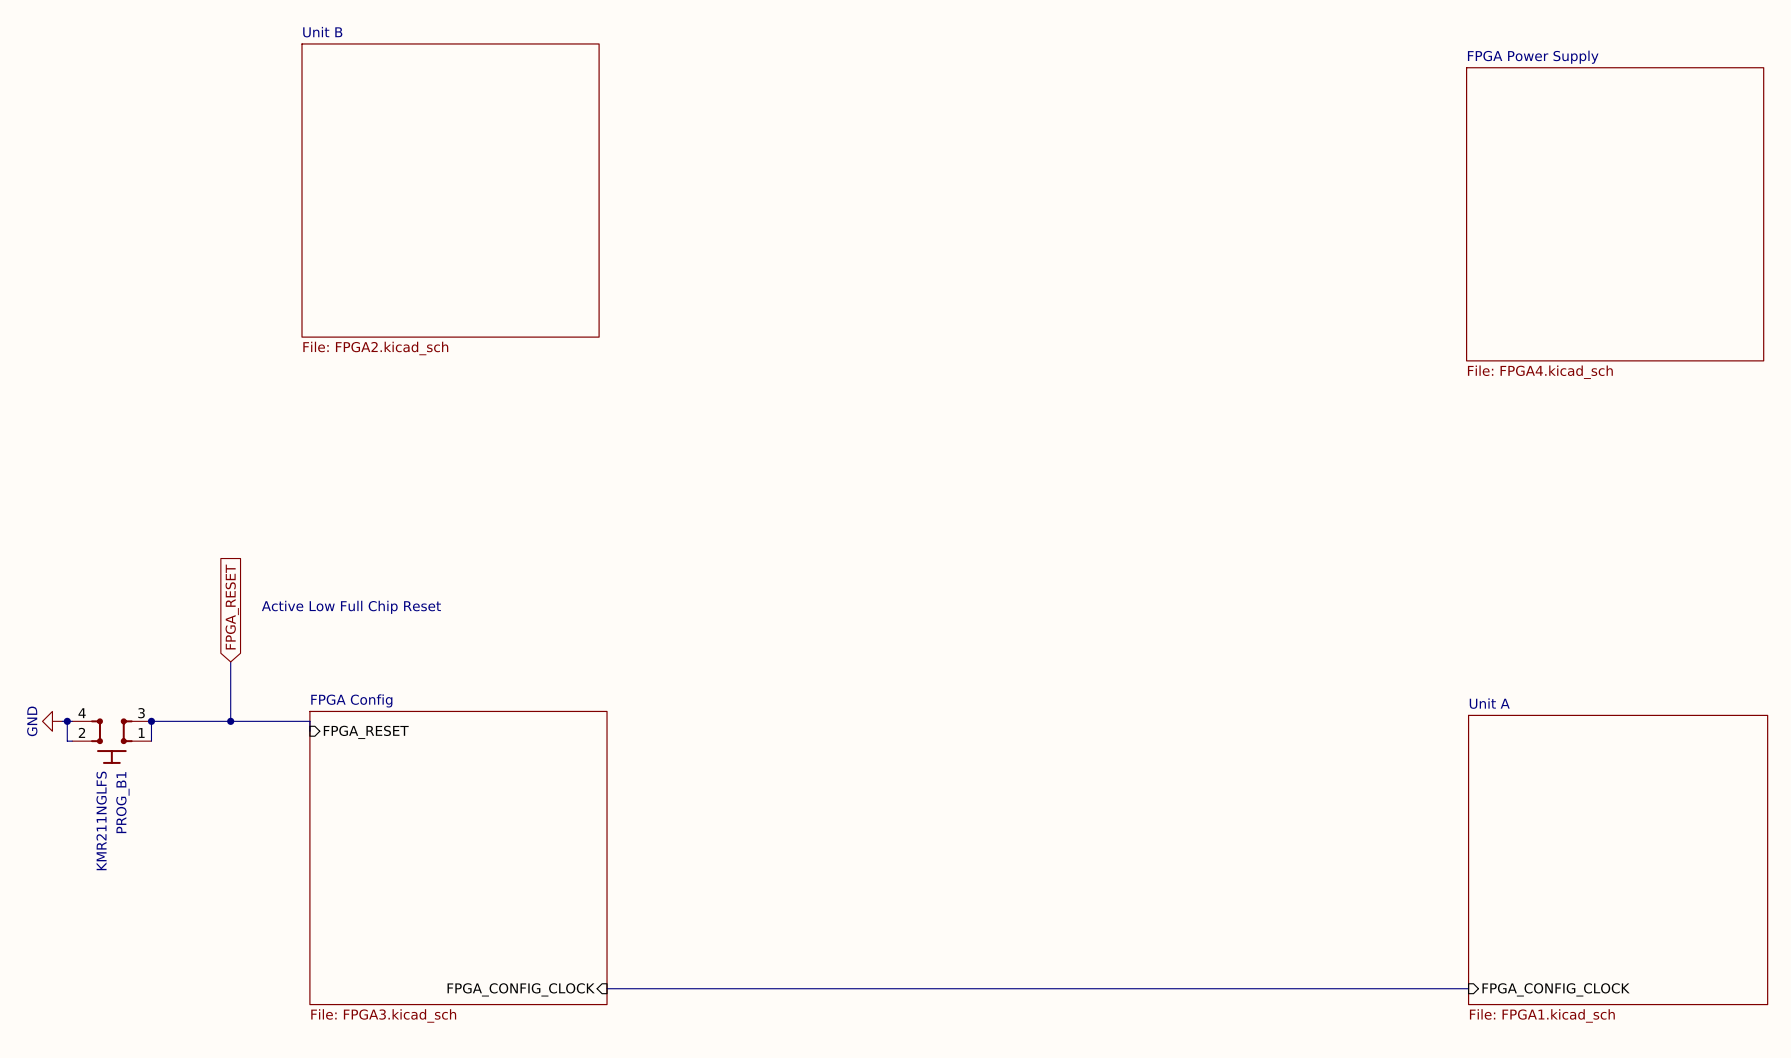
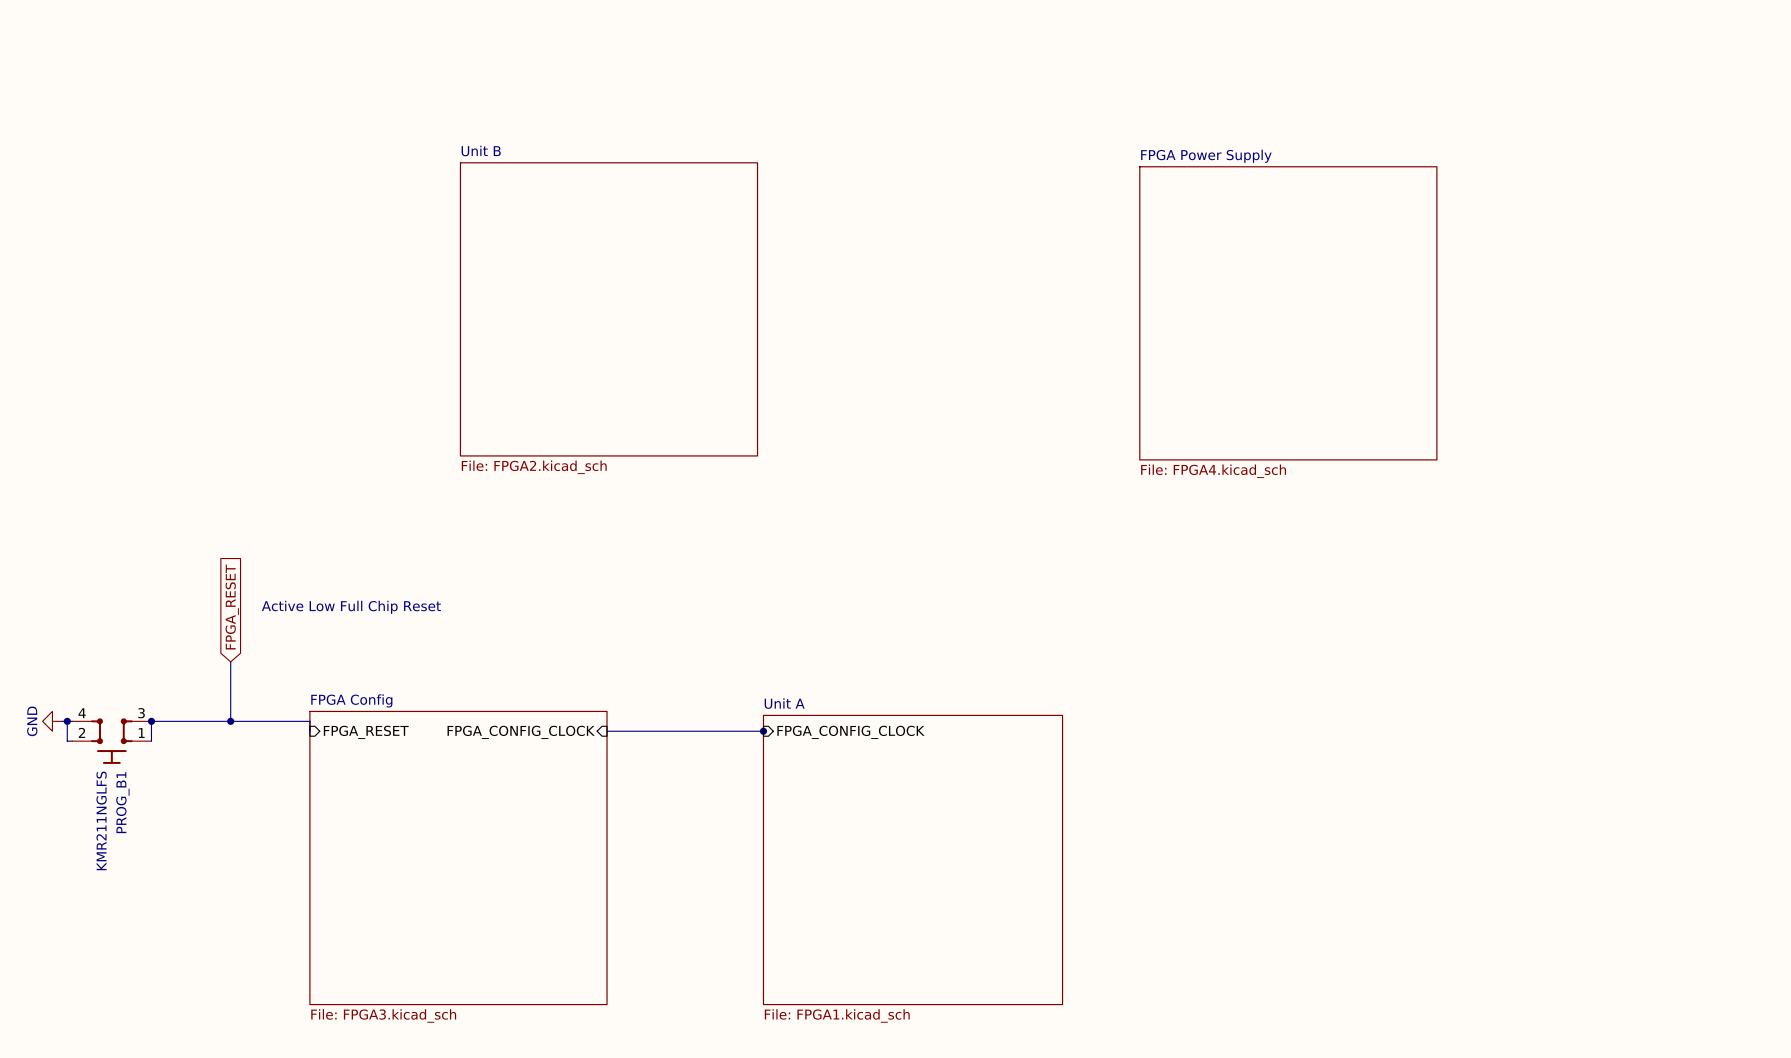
sheet Unit B: File: FPGA2.kicad_sch (450, 190) -> none
sheet FPGA Power Supply: File: FPGA4.kicad_sch (1615, 214) -> none
sheet Unit B: none -> File: FPGA2.kicad_sch (608, 309)
sheet FPGA Power Supply: none -> File: FPGA4.kicad_sch (1288, 313)
wire: none -> (607, 731) (765, 731)
junction: none -> (763, 731)
sheet pin: none -> FPGA_CONFIG_CLOCK (521, 732)
sheet pin: none -> FPGA_CONFIG_CLOCK (850, 732)
sheet Unit A: none -> File: FPGA1.kicad_sch (913, 859)
sheet Unit A: File: FPGA1.kicad_sch (1618, 859) -> none
wire: (607, 988) (1468, 988) -> none
sheet pin: FPGA_CONFIG_CLOCK (521, 989) -> none
sheet pin: FPGA_CONFIG_CLOCK (1556, 989) -> none

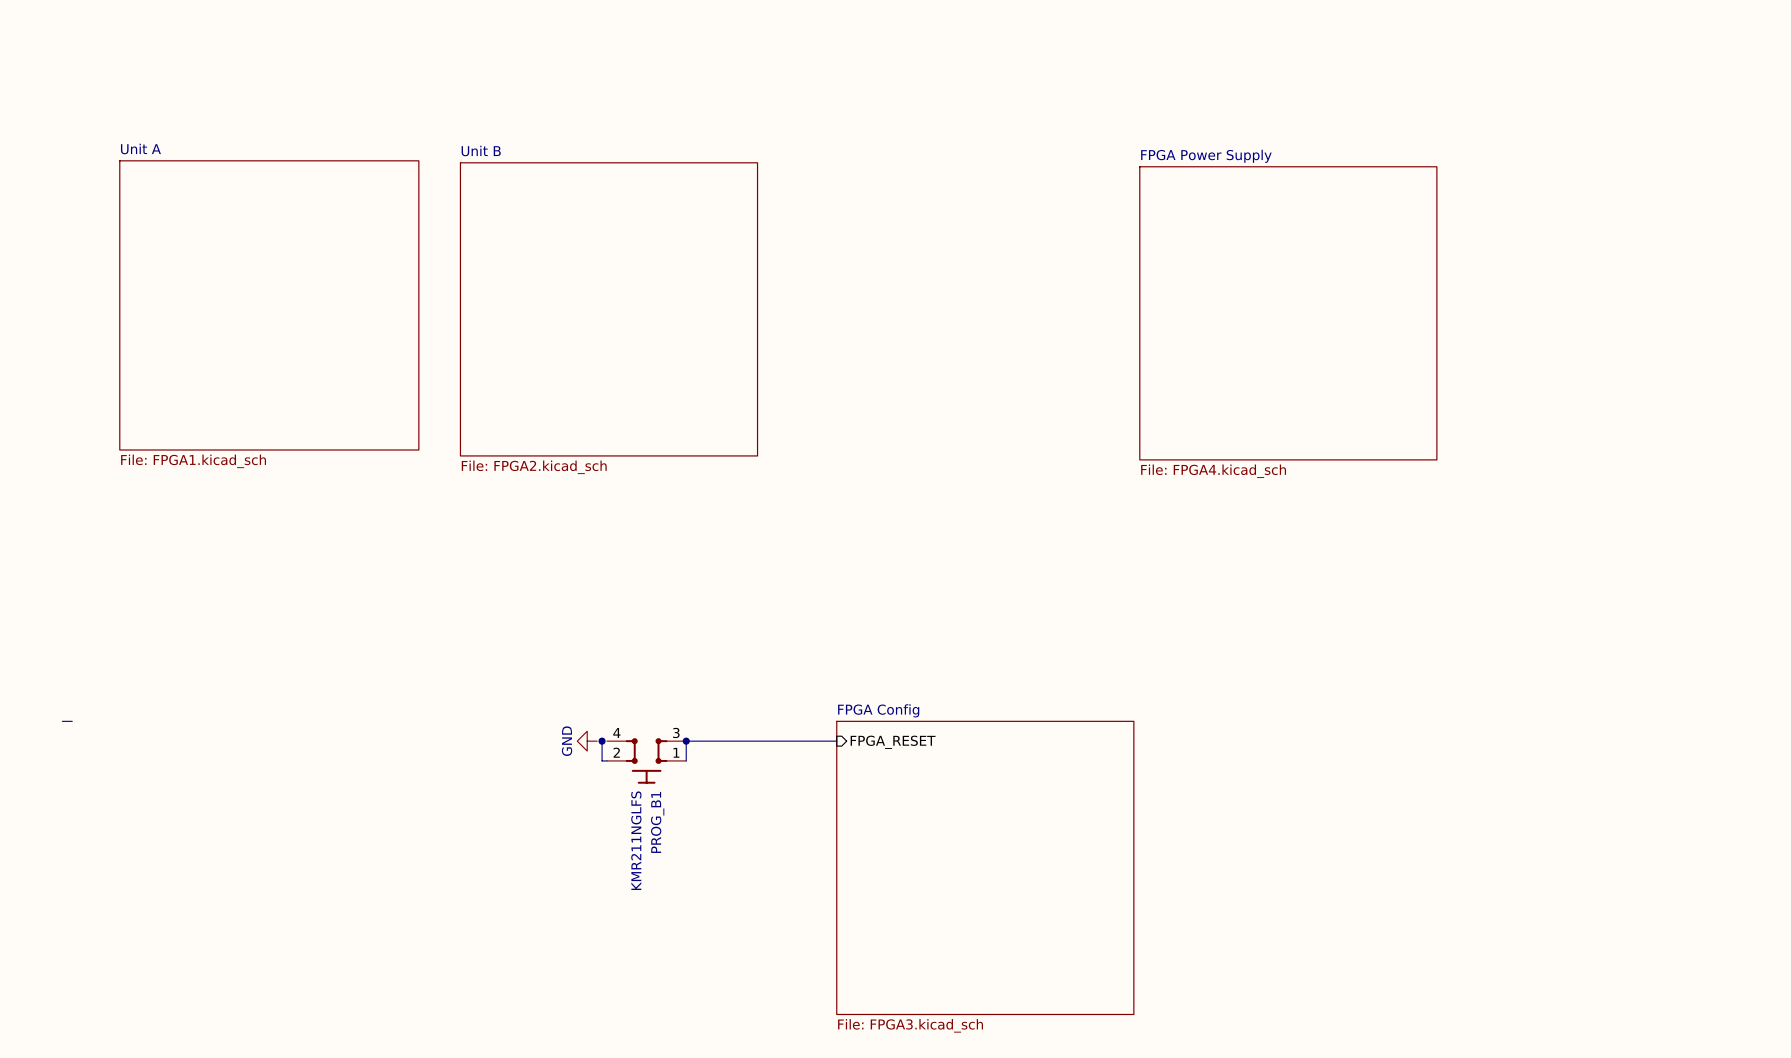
sheet Unit A: none -> File: FPGA1.kicad_sch (269, 305)
global label: FPGA_RESET (232, 607) -> none
text: Active Low Full Chip Reset (351, 607) -> none
wire: (230, 661) (230, 721) -> none
power symbol: GND (52, 721) -> none
wire: (67, 721) (67, 741) (72, 741) -> none
junction: (67, 721) -> none
junction: (151, 721) -> none
junction: (230, 721) -> none
wire: (309, 731) (309, 721) (151, 721) (151, 741) -> none
wire: (607, 731) (765, 731) -> none
junction: (763, 731) -> none
sheet pin: FPGA_RESET (366, 732) -> none
sheet pin: FPGA_CONFIG_CLOCK (521, 732) -> none
sheet pin: FPGA_CONFIG_CLOCK (850, 732) -> none
PROG_B1 position: (111, 741) -> (646, 760)
power symbol: none -> GND (587, 741)
wire: none -> (602, 741) (602, 760) (607, 760)
junction: none -> (602, 741)
junction: none -> (686, 741)
wire: none -> (836, 741) (686, 741) (686, 760)
sheet pin: none -> FPGA_RESET (893, 742)
sheet FPGA Config: File: FPGA3.kicad_sch (458, 858) -> none
sheet Unit A: File: FPGA1.kicad_sch (913, 859) -> none
sheet FPGA Config: none -> File: FPGA3.kicad_sch (985, 867)

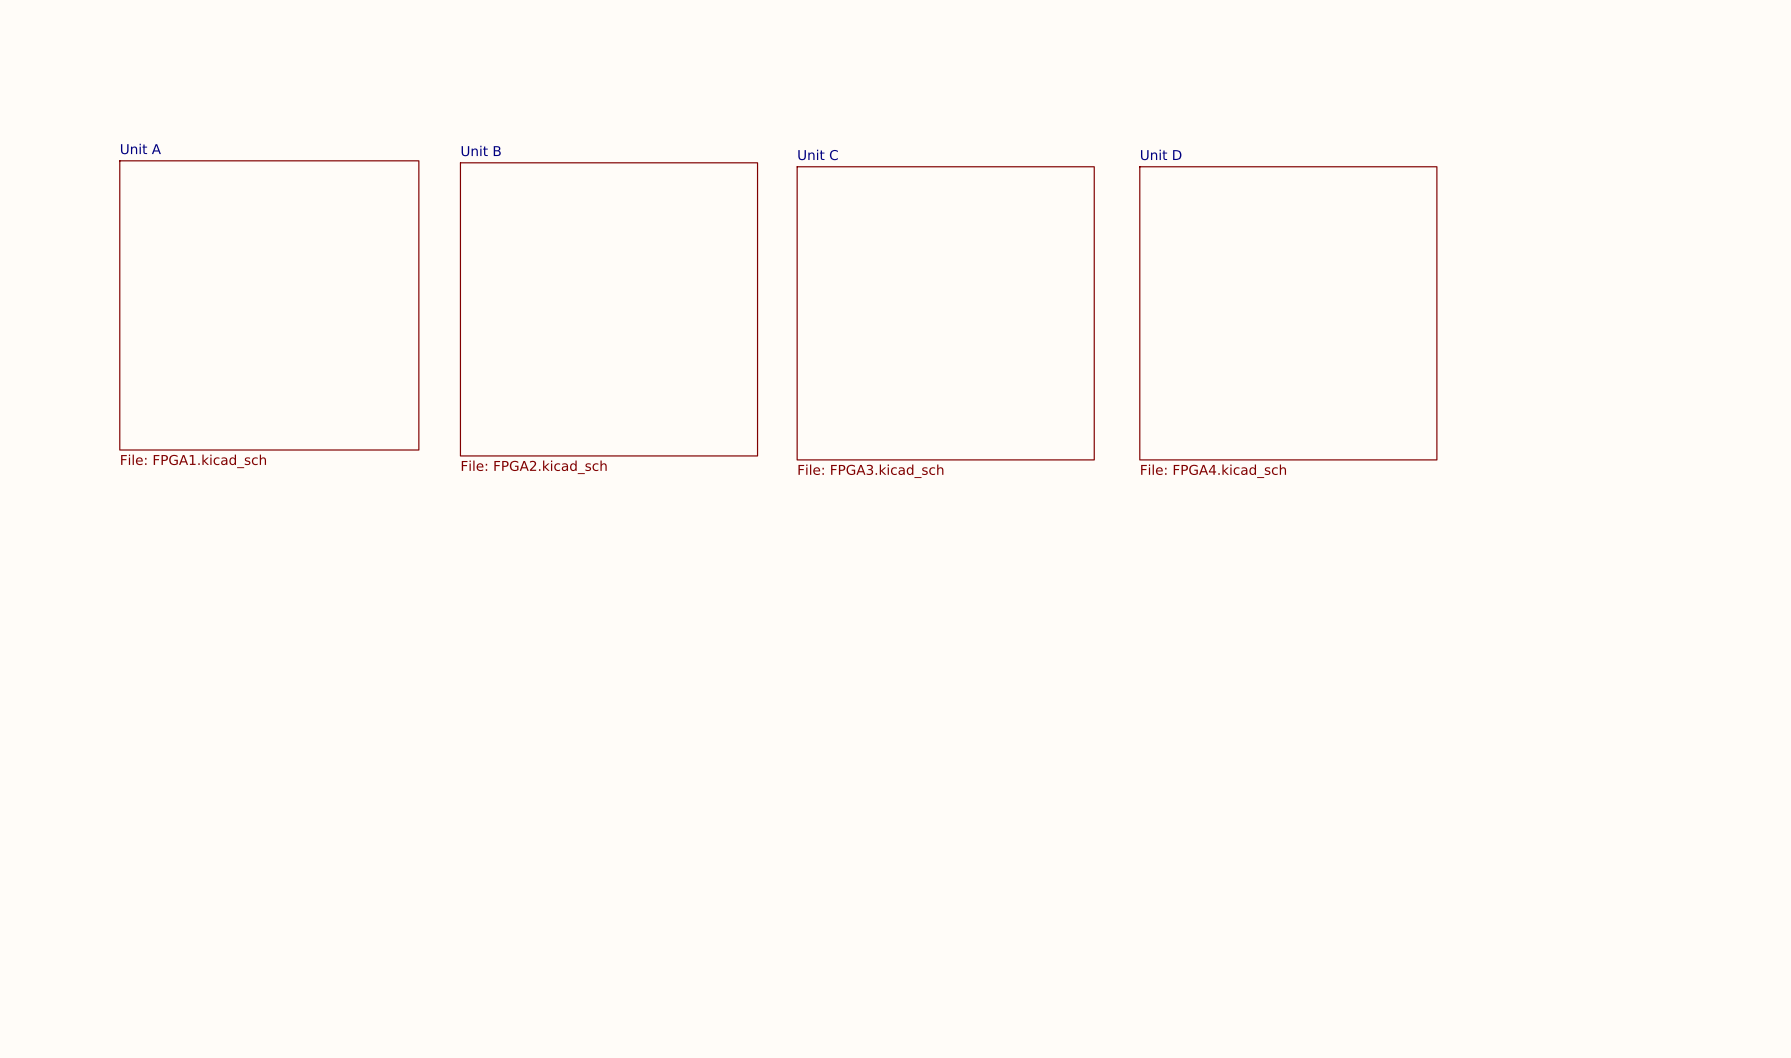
sheet FPGA Power Supply name: FPGA Power Supply (1206, 156) -> Unit D (1161, 154)
sheet Unit C: none -> File: FPGA3.kicad_sch (945, 313)
wire: (62, 721) (72, 721) -> none
power symbol: GND (587, 741) -> none
wire: (602, 741) (602, 760) (607, 760) -> none
junction: (602, 741) -> none
junction: (686, 741) -> none
wire: (836, 741) (686, 741) (686, 760) -> none
sheet pin: FPGA_RESET (893, 742) -> none
PROG_B1: (646, 760) -> none
sheet FPGA Config: File: FPGA3.kicad_sch (985, 867) -> none

